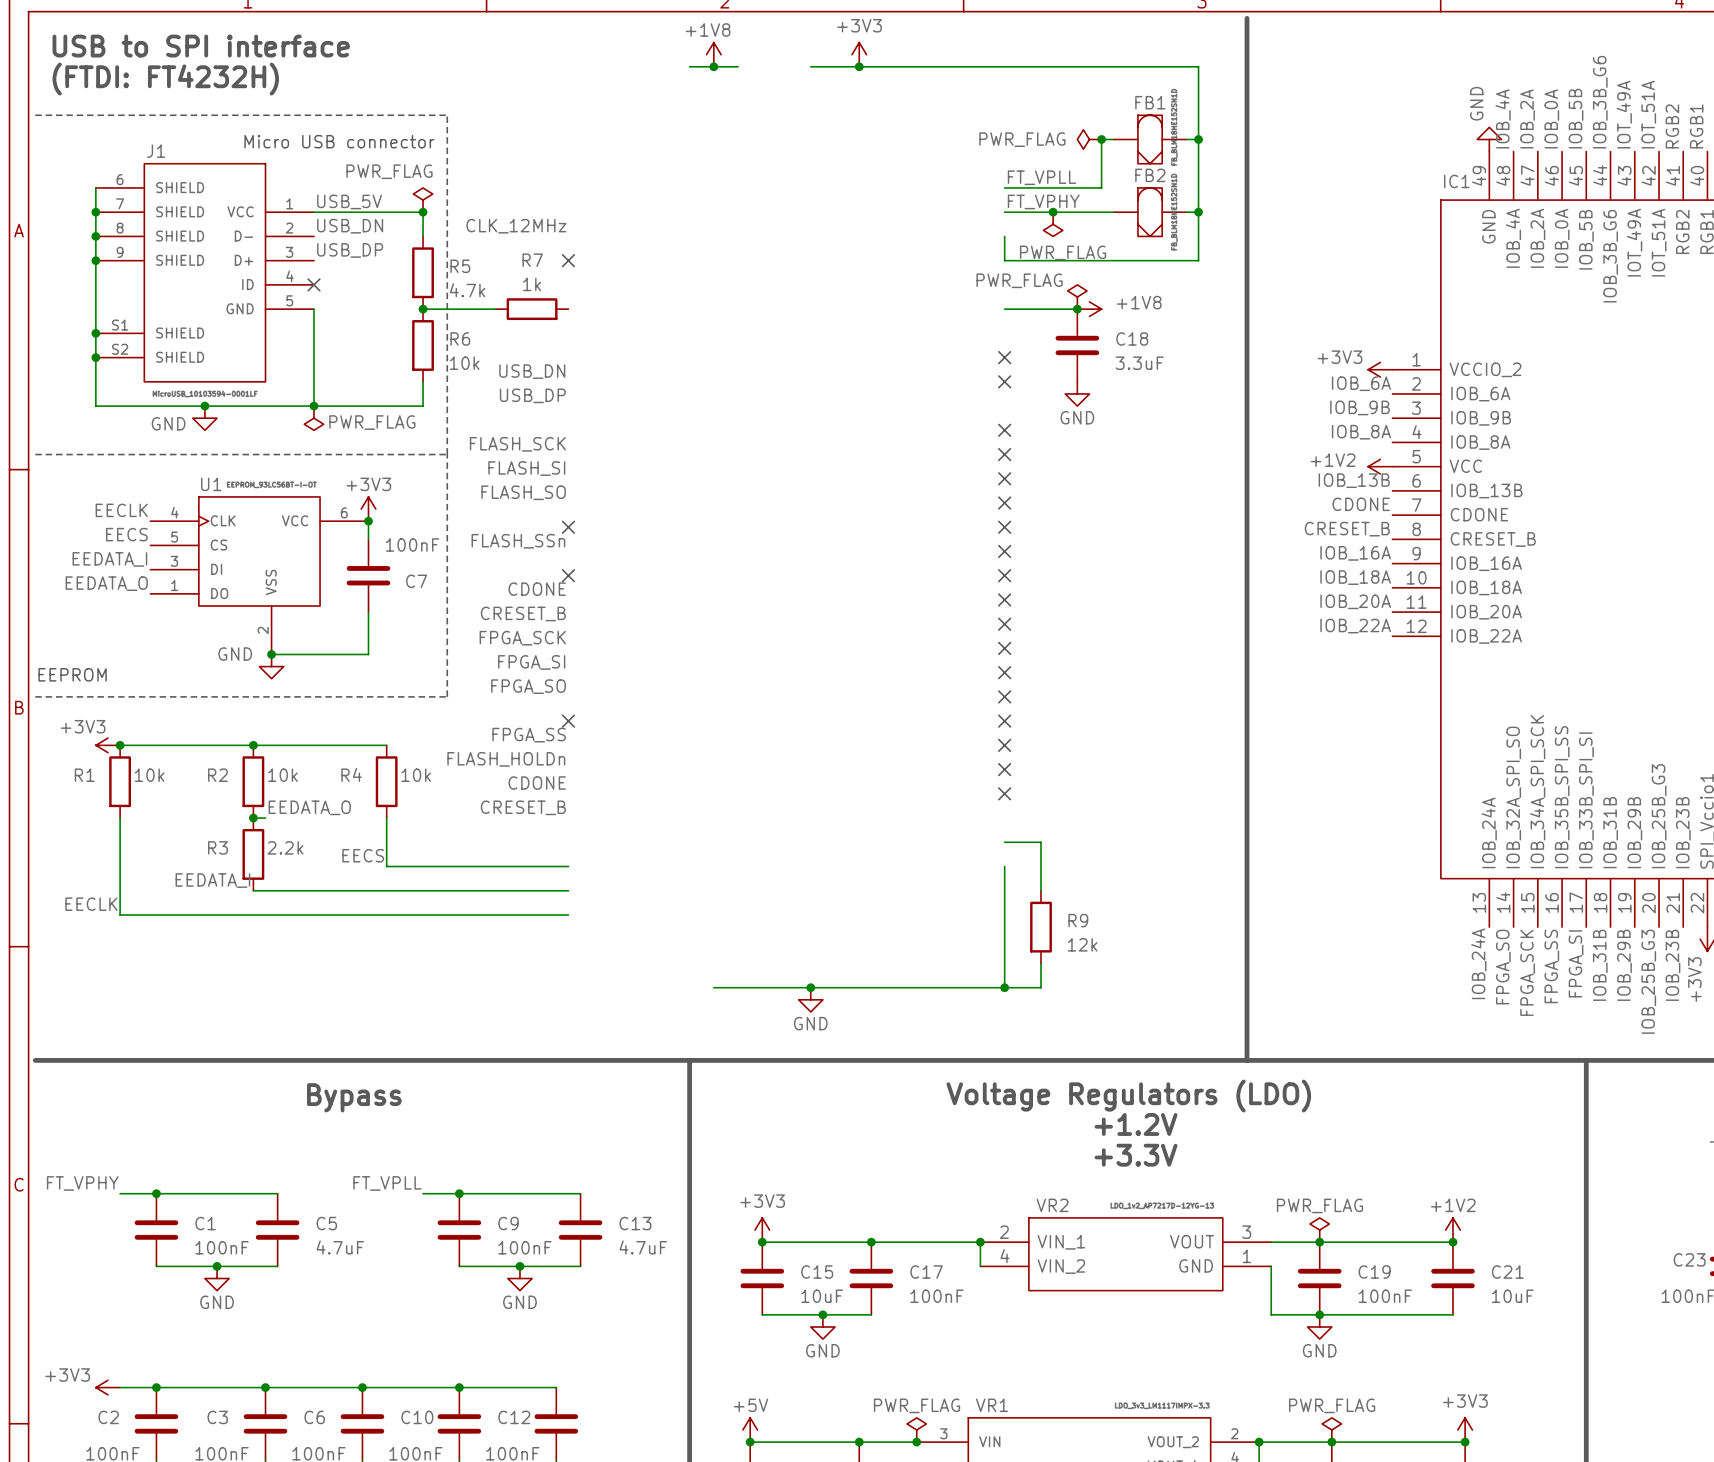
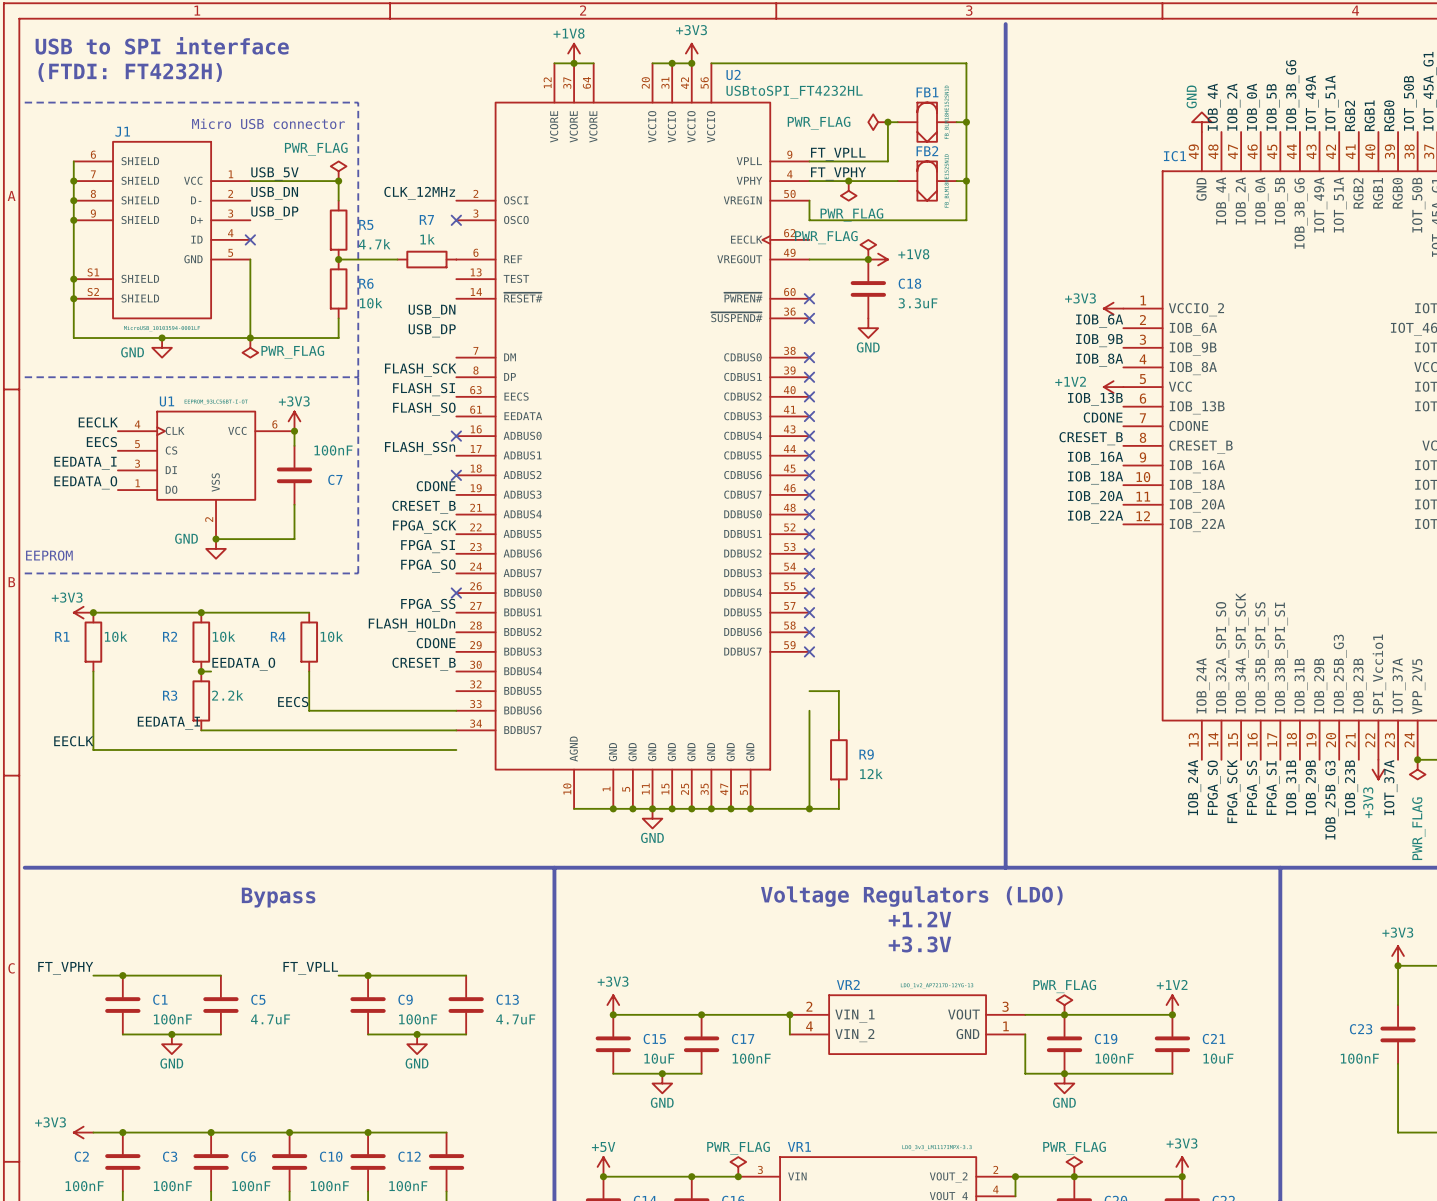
junction: none -> (672, 63)
wire: (859, 66) (883, 66) -> none
U2: none -> USBtoSPI_FT4232HL (632, 436)
junction: none -> (613, 808)
junction: none -> (632, 808)
junction: none -> (672, 808)
junction: none -> (691, 808)
junction: none -> (711, 808)
junction: none -> (731, 808)
junction: none -> (750, 808)

